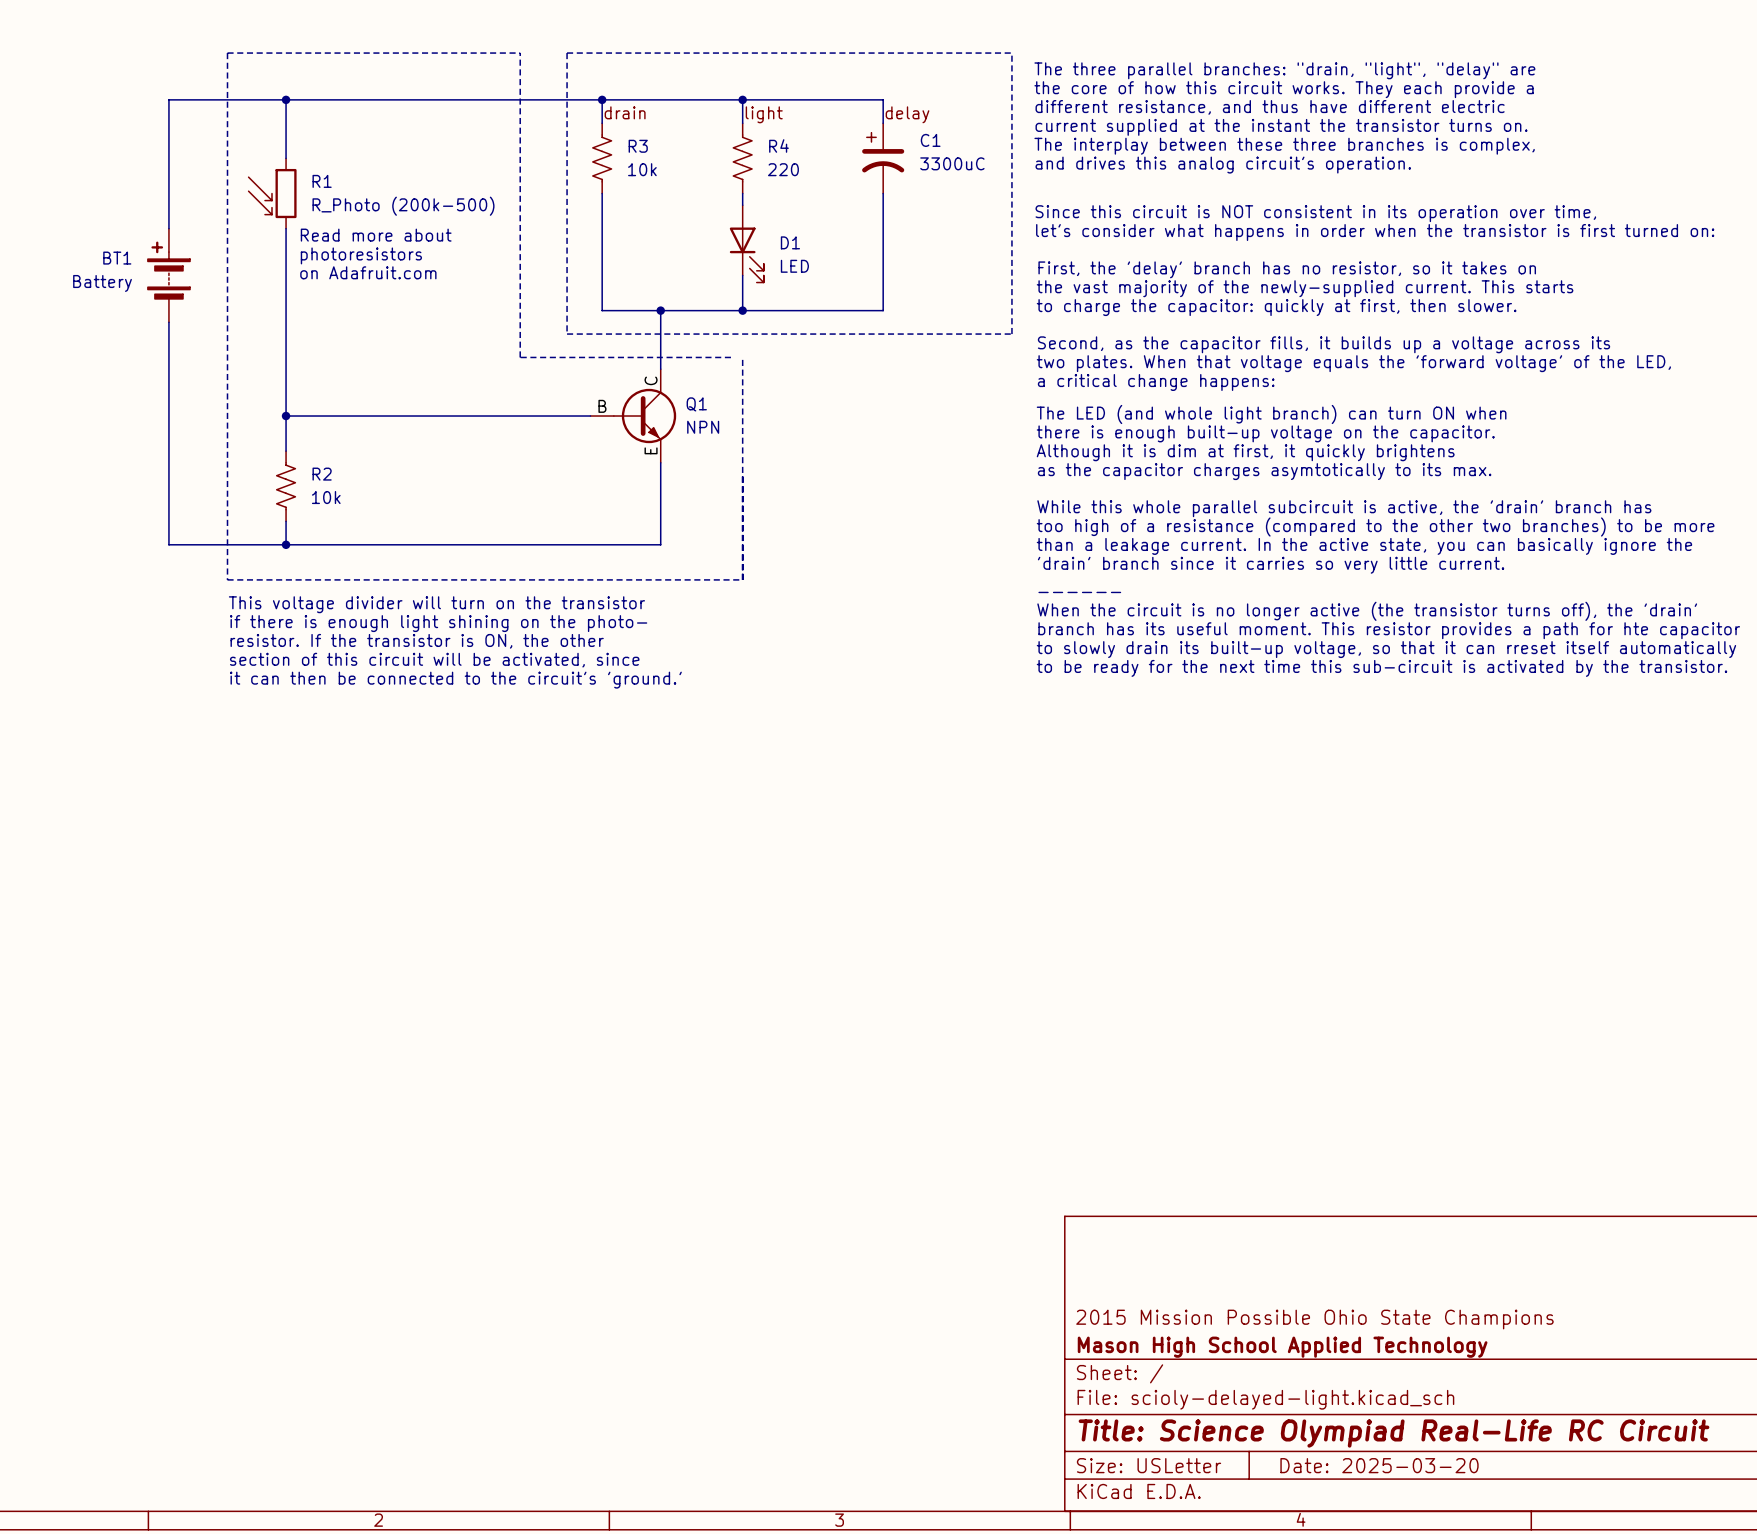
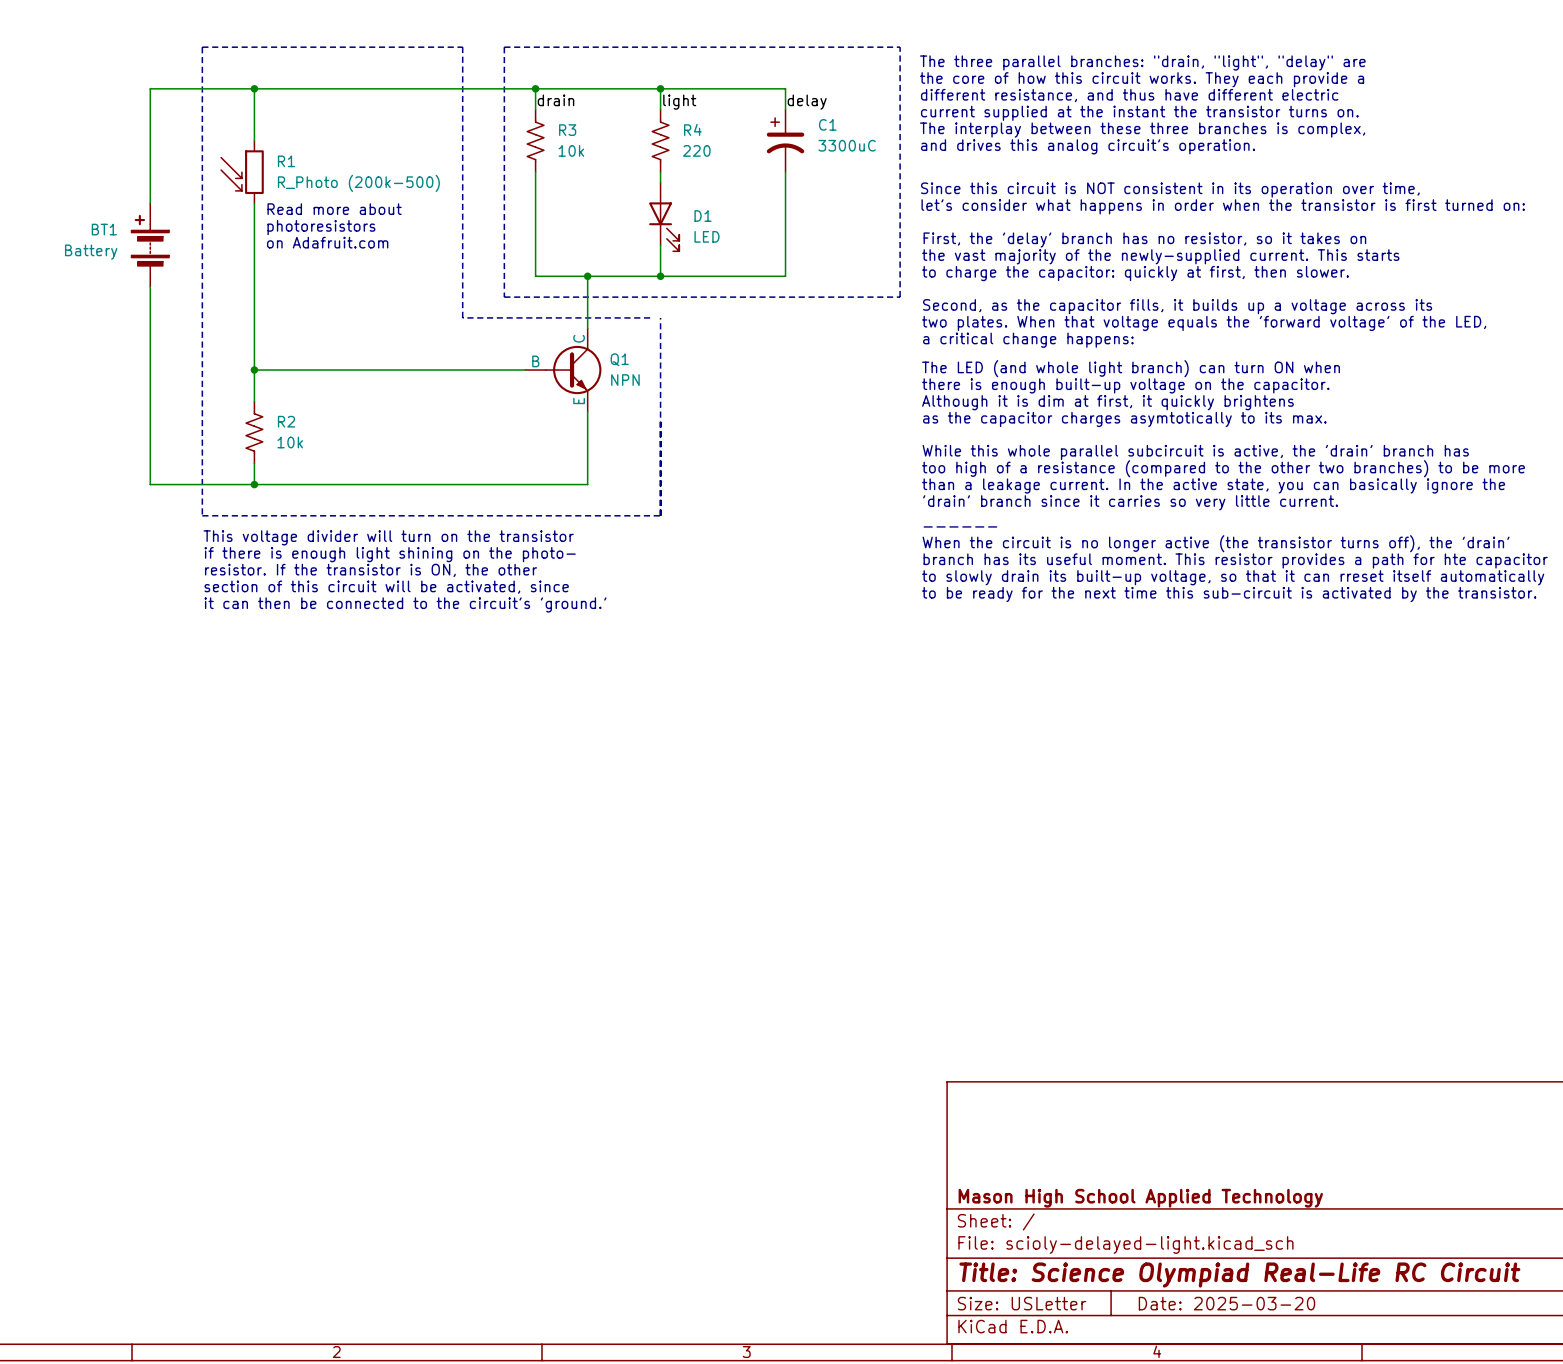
title block: 2015 Mission Possible Ohio State Champions (1314, 1319) -> none

